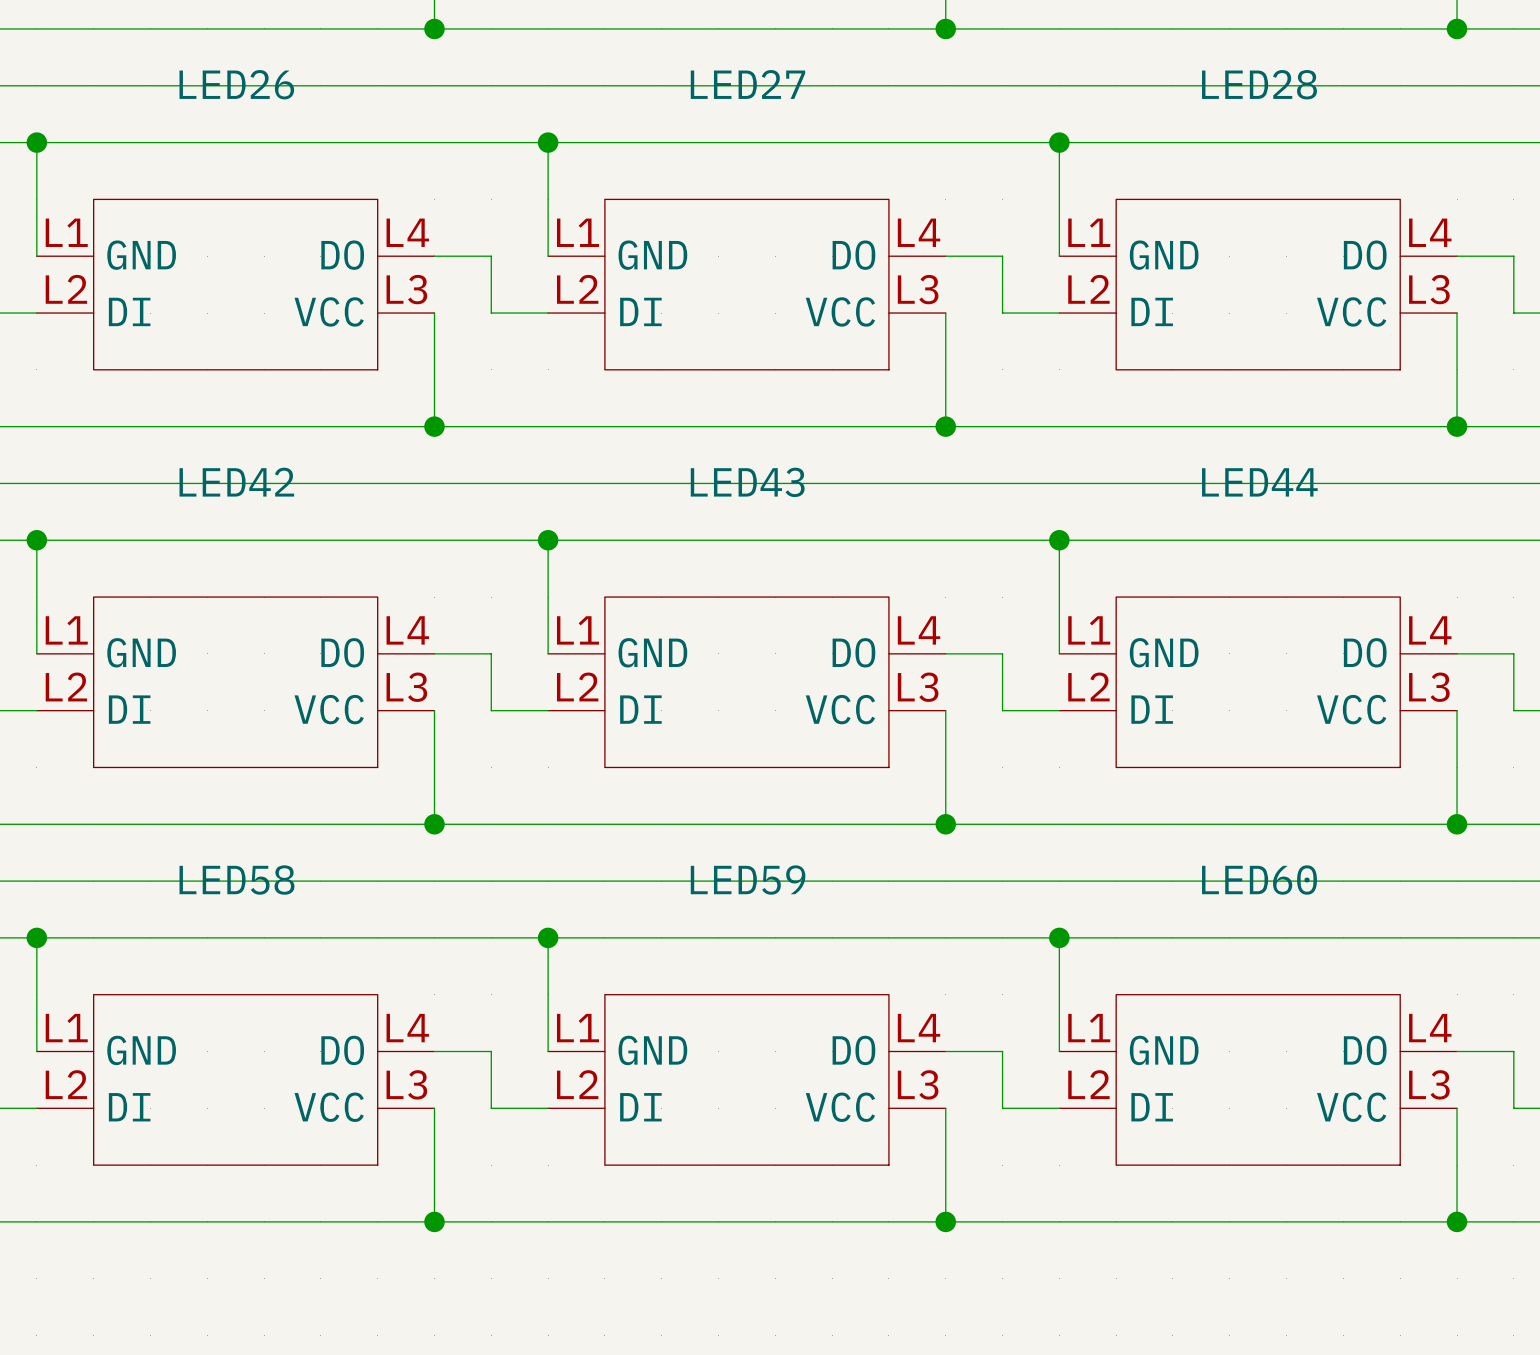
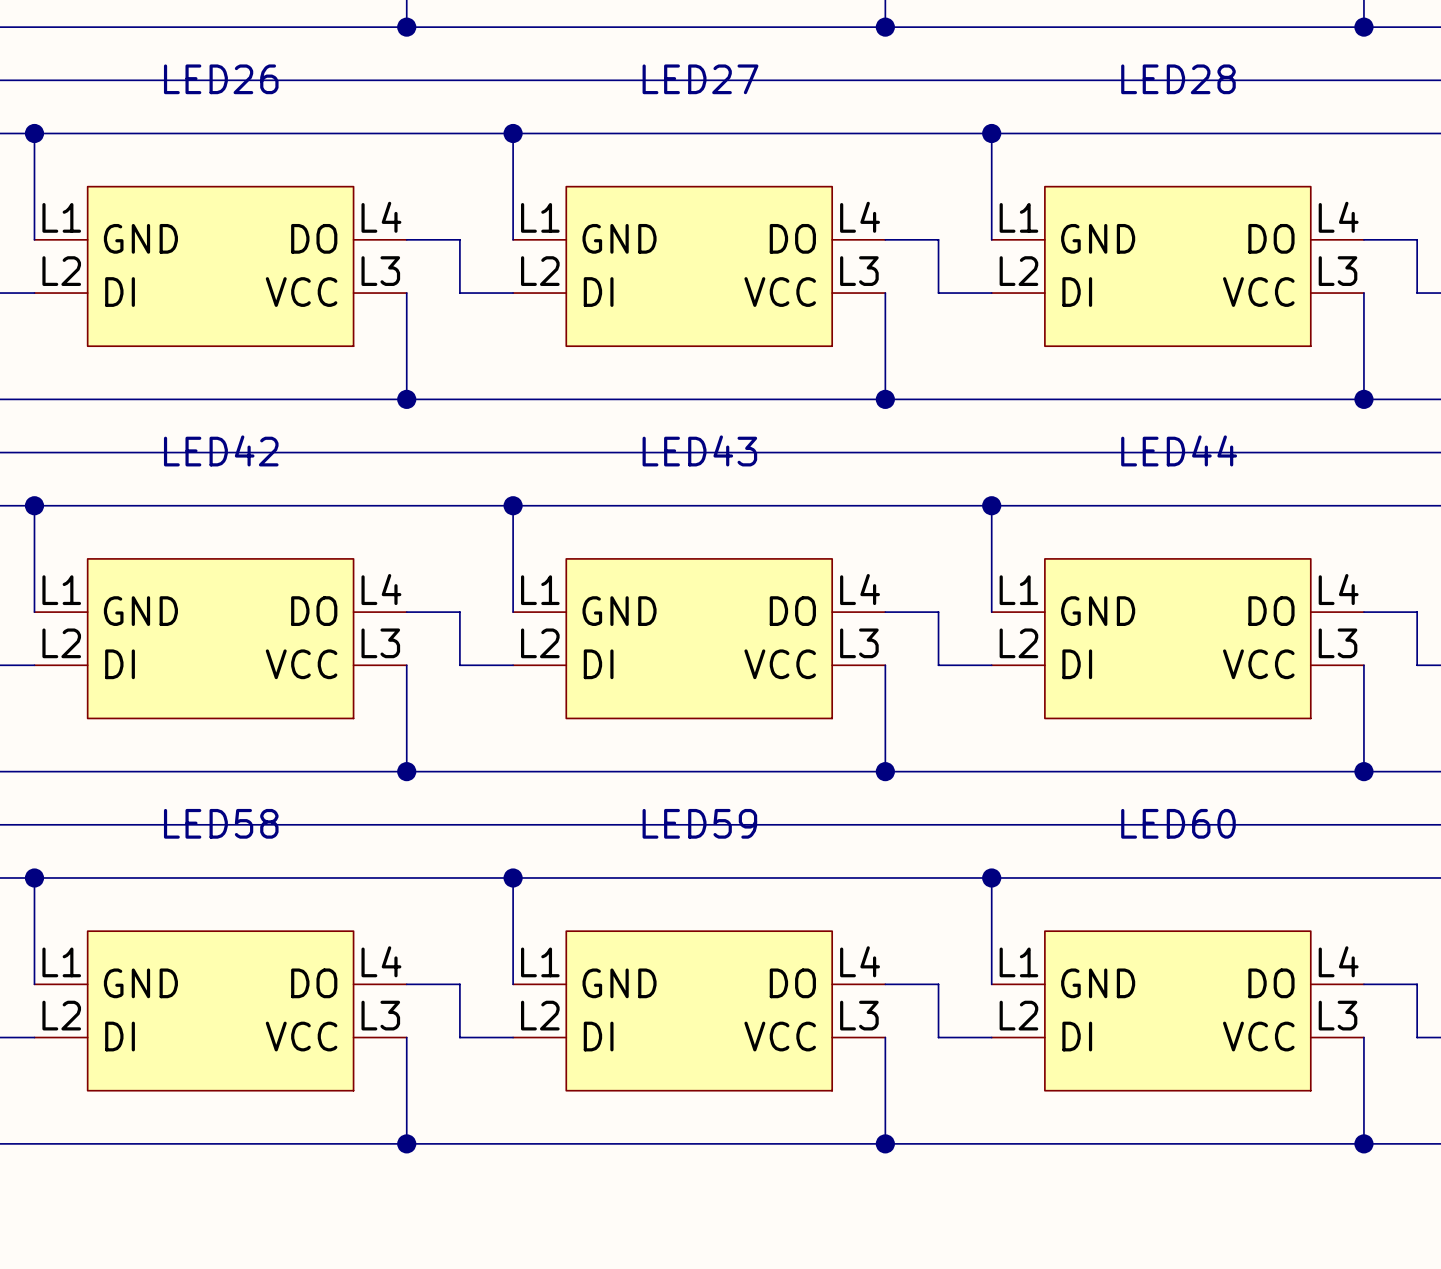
LED26 symbol: [36, 199, 435, 370] -> [34, 186, 407, 347]
LED27 symbol: [548, 199, 946, 370] -> [513, 186, 886, 347]
LED28 symbol: [1059, 199, 1458, 370] -> [991, 186, 1364, 347]
LED42 symbol: [36, 597, 435, 768] -> [34, 558, 407, 719]
LED43 symbol: [548, 597, 946, 768] -> [513, 558, 886, 719]
LED44 symbol: [1059, 597, 1458, 768] -> [991, 558, 1364, 719]
LED58 symbol: [36, 994, 435, 1166] -> [34, 931, 407, 1091]
LED59 symbol: [548, 994, 946, 1166] -> [513, 931, 886, 1091]
LED60 symbol: [1059, 994, 1458, 1166] -> [991, 931, 1364, 1091]

